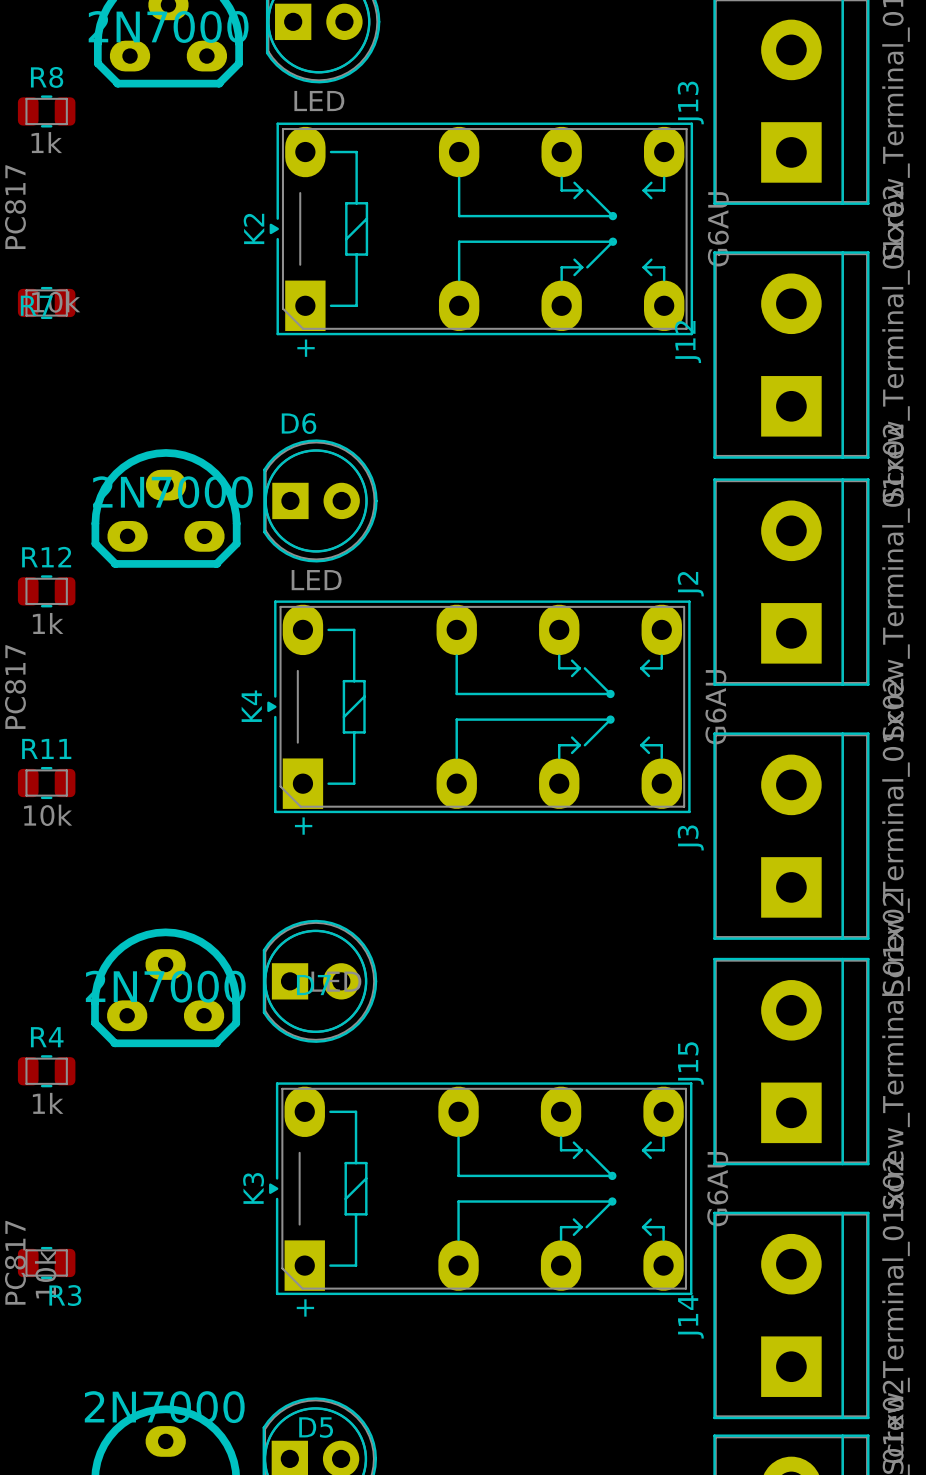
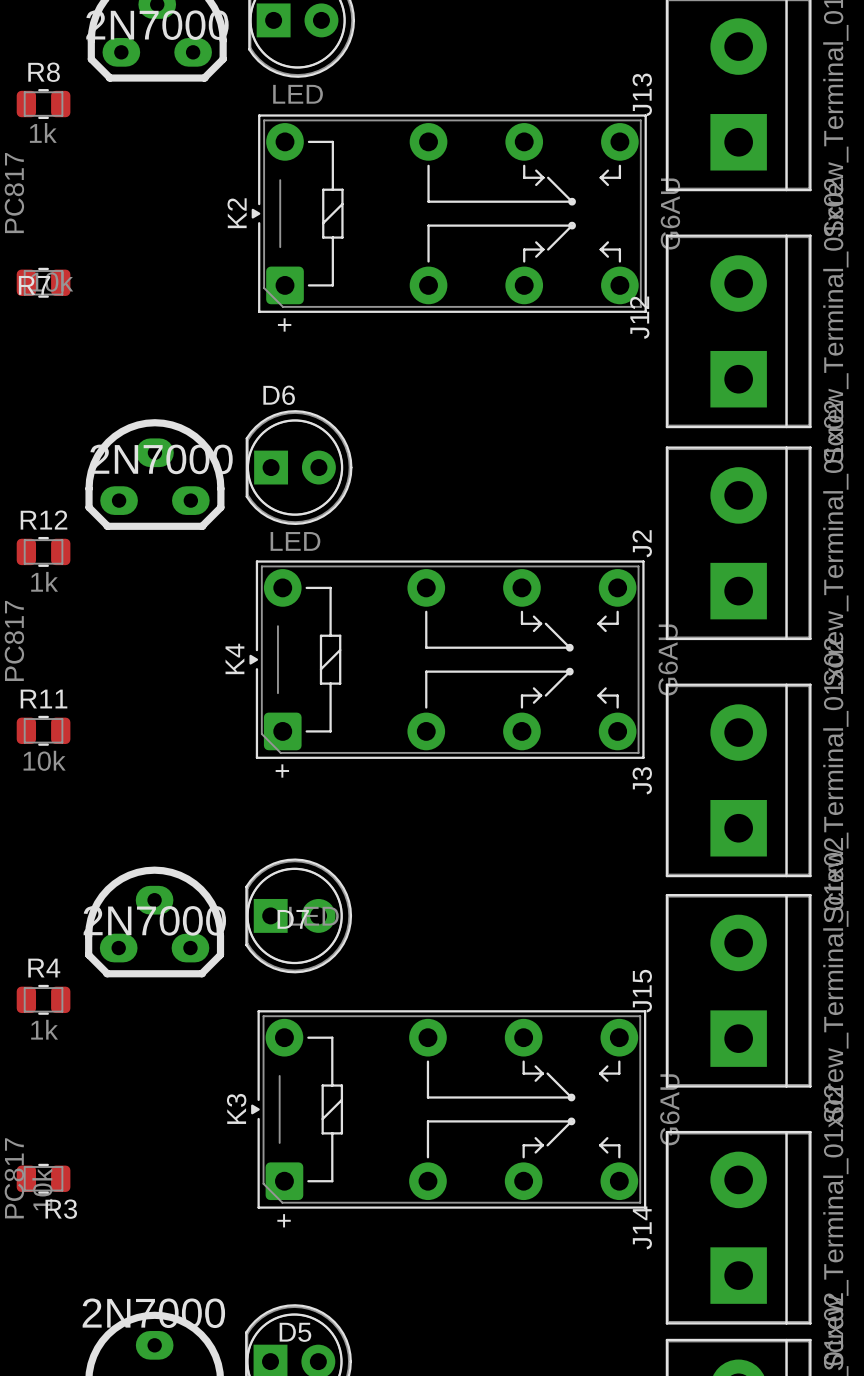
K2 footprint: [269, 122, 694, 336] -> [251, 114, 647, 313]
K4 footprint: [267, 600, 691, 814] -> [249, 560, 645, 759]
K3 footprint: [269, 1082, 693, 1296] -> [251, 1010, 647, 1209]

